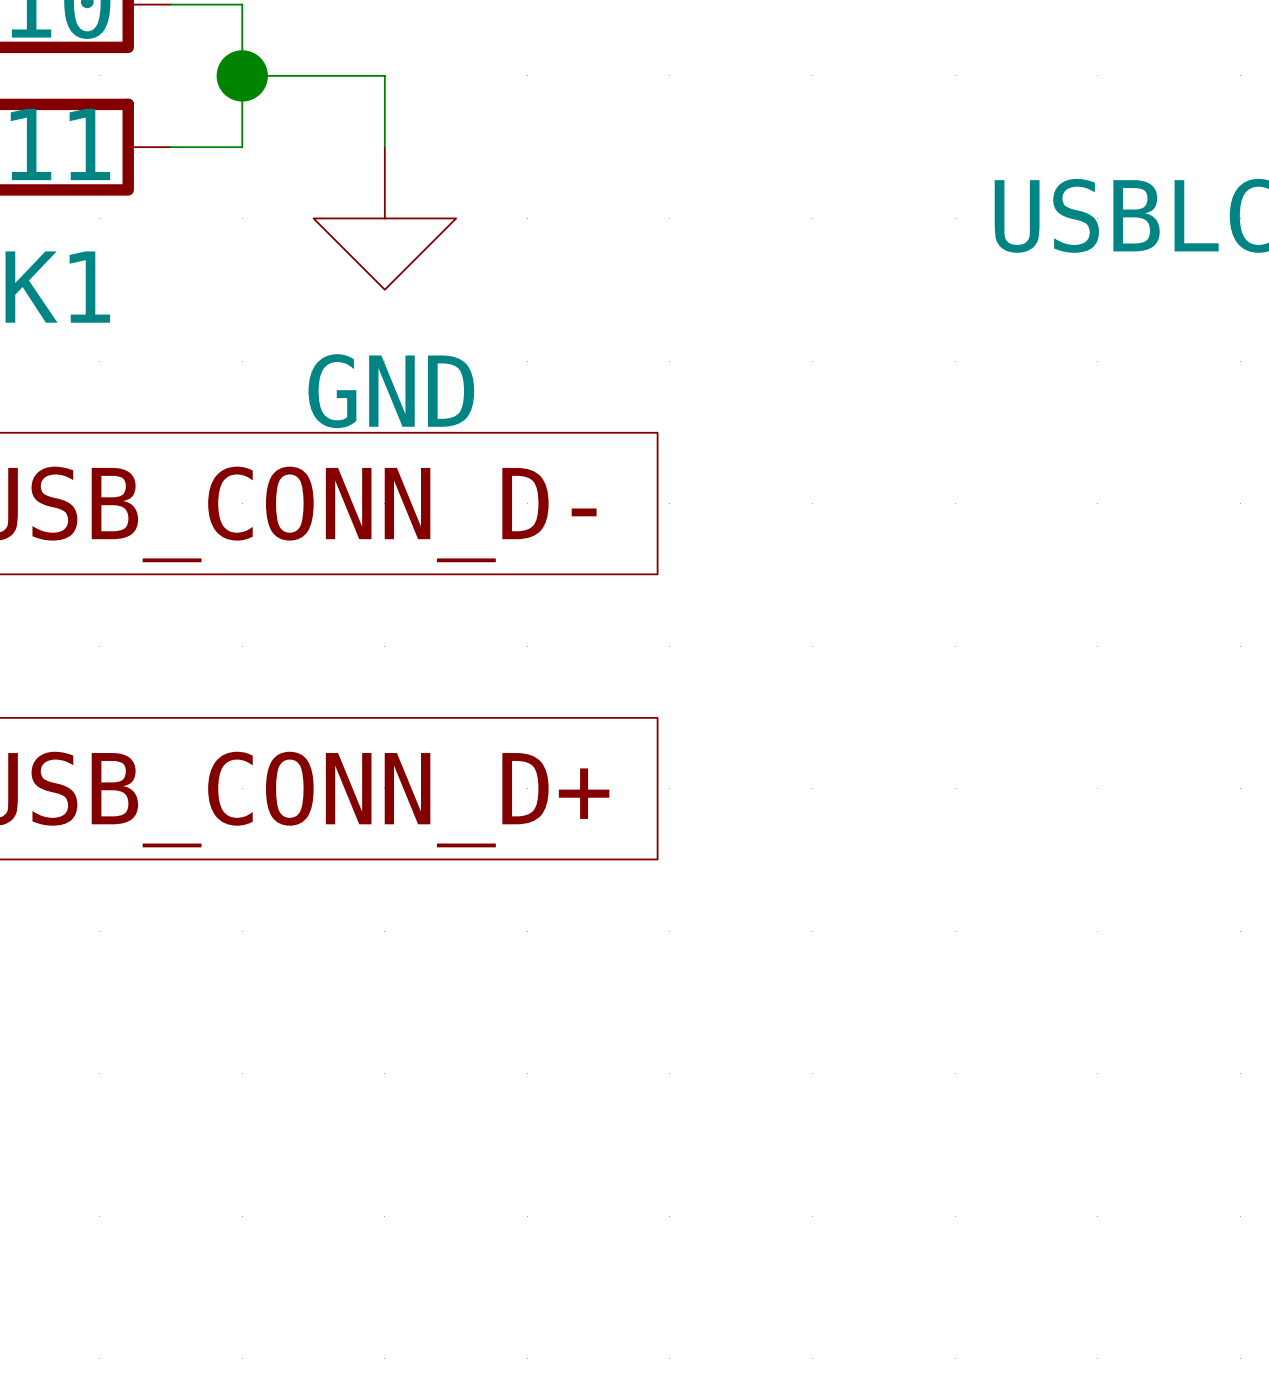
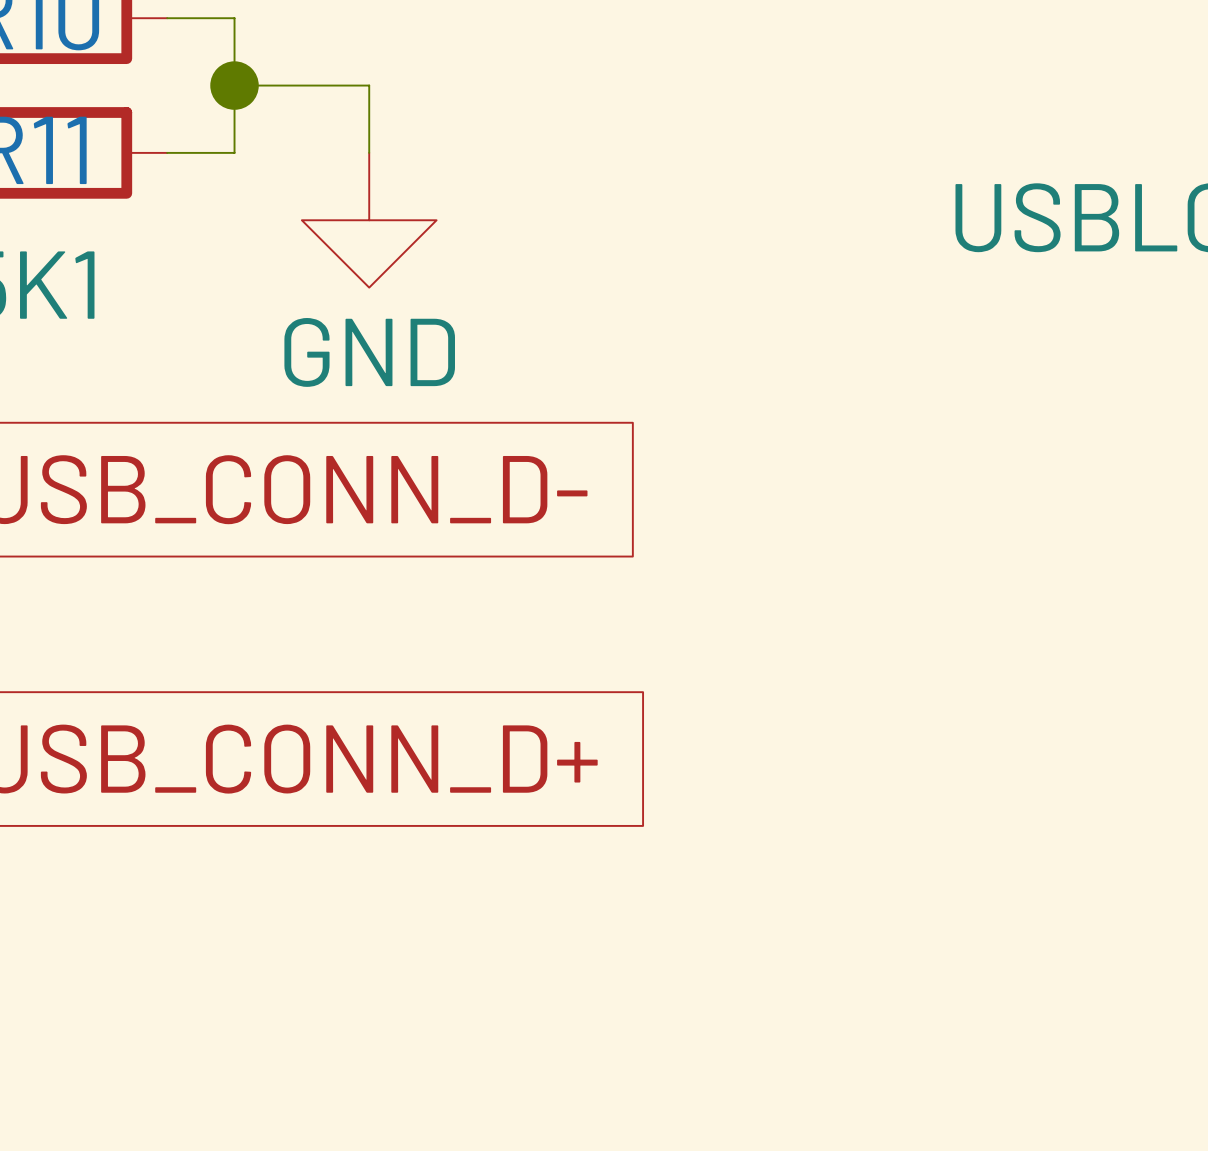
power symbol text position: GND (391, 391) -> GND (369, 352)

